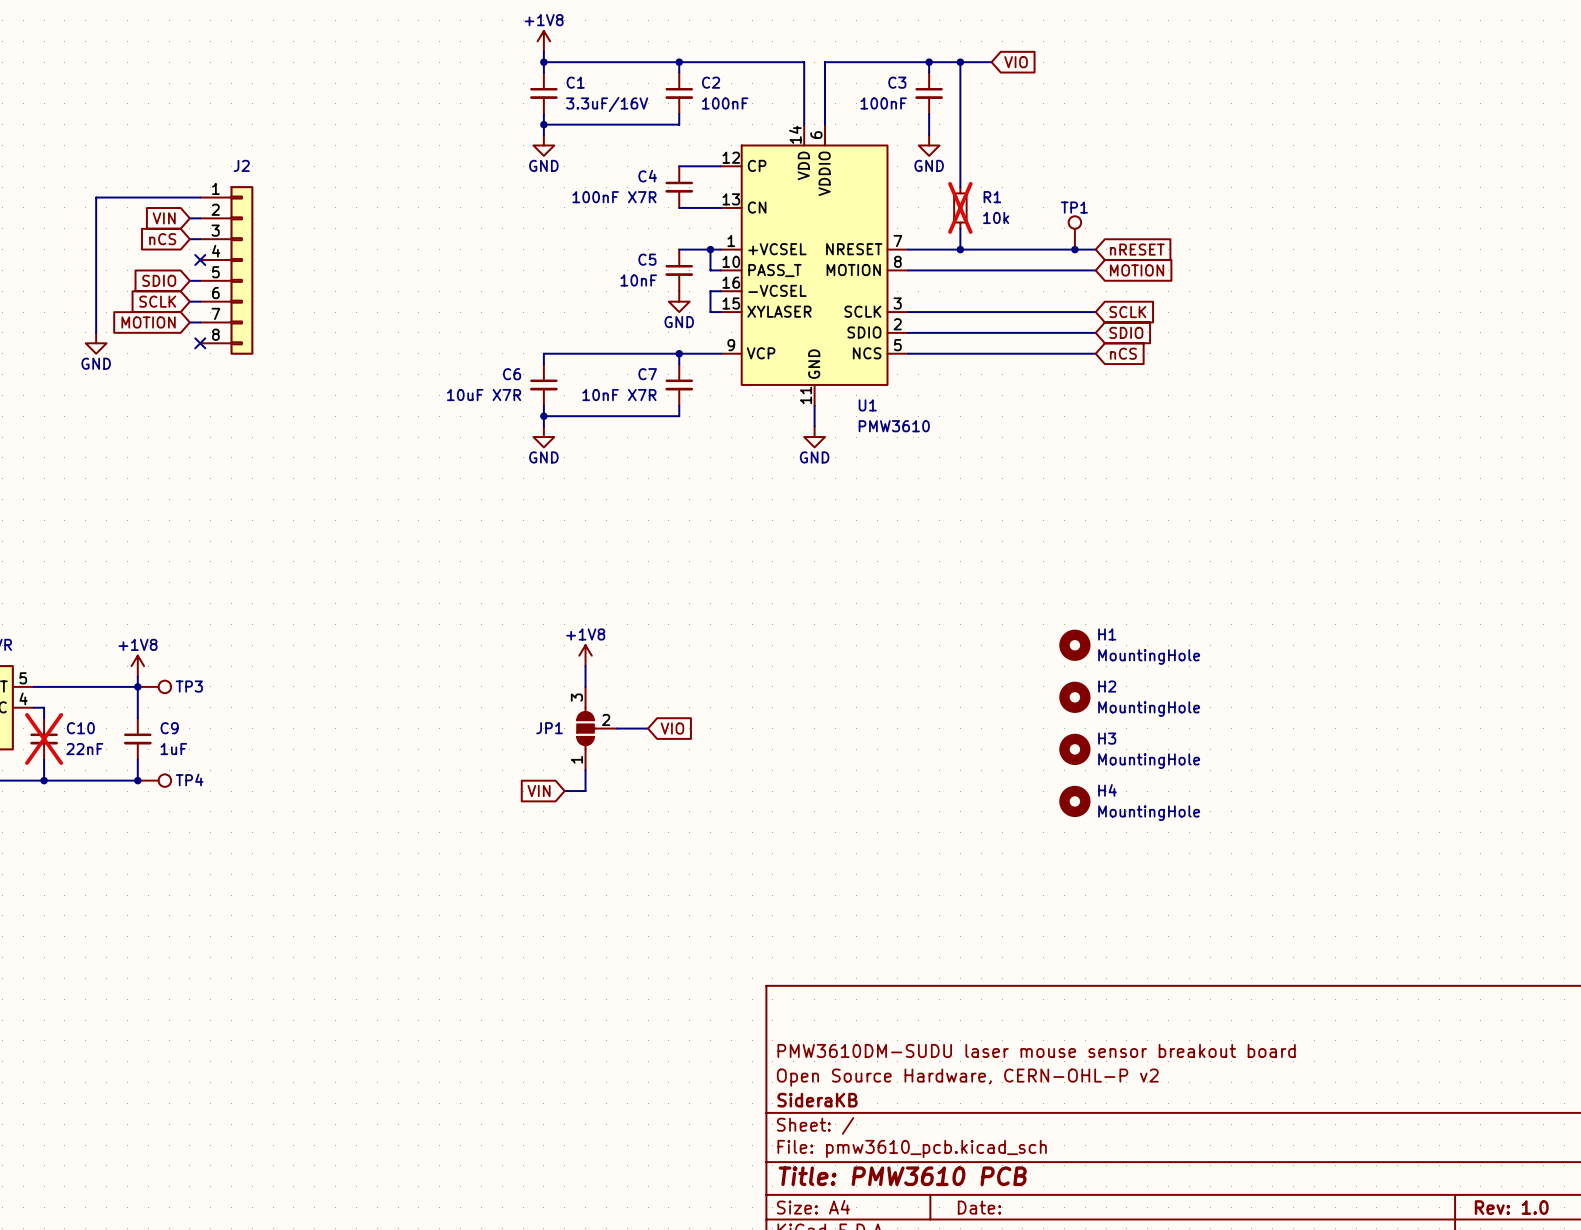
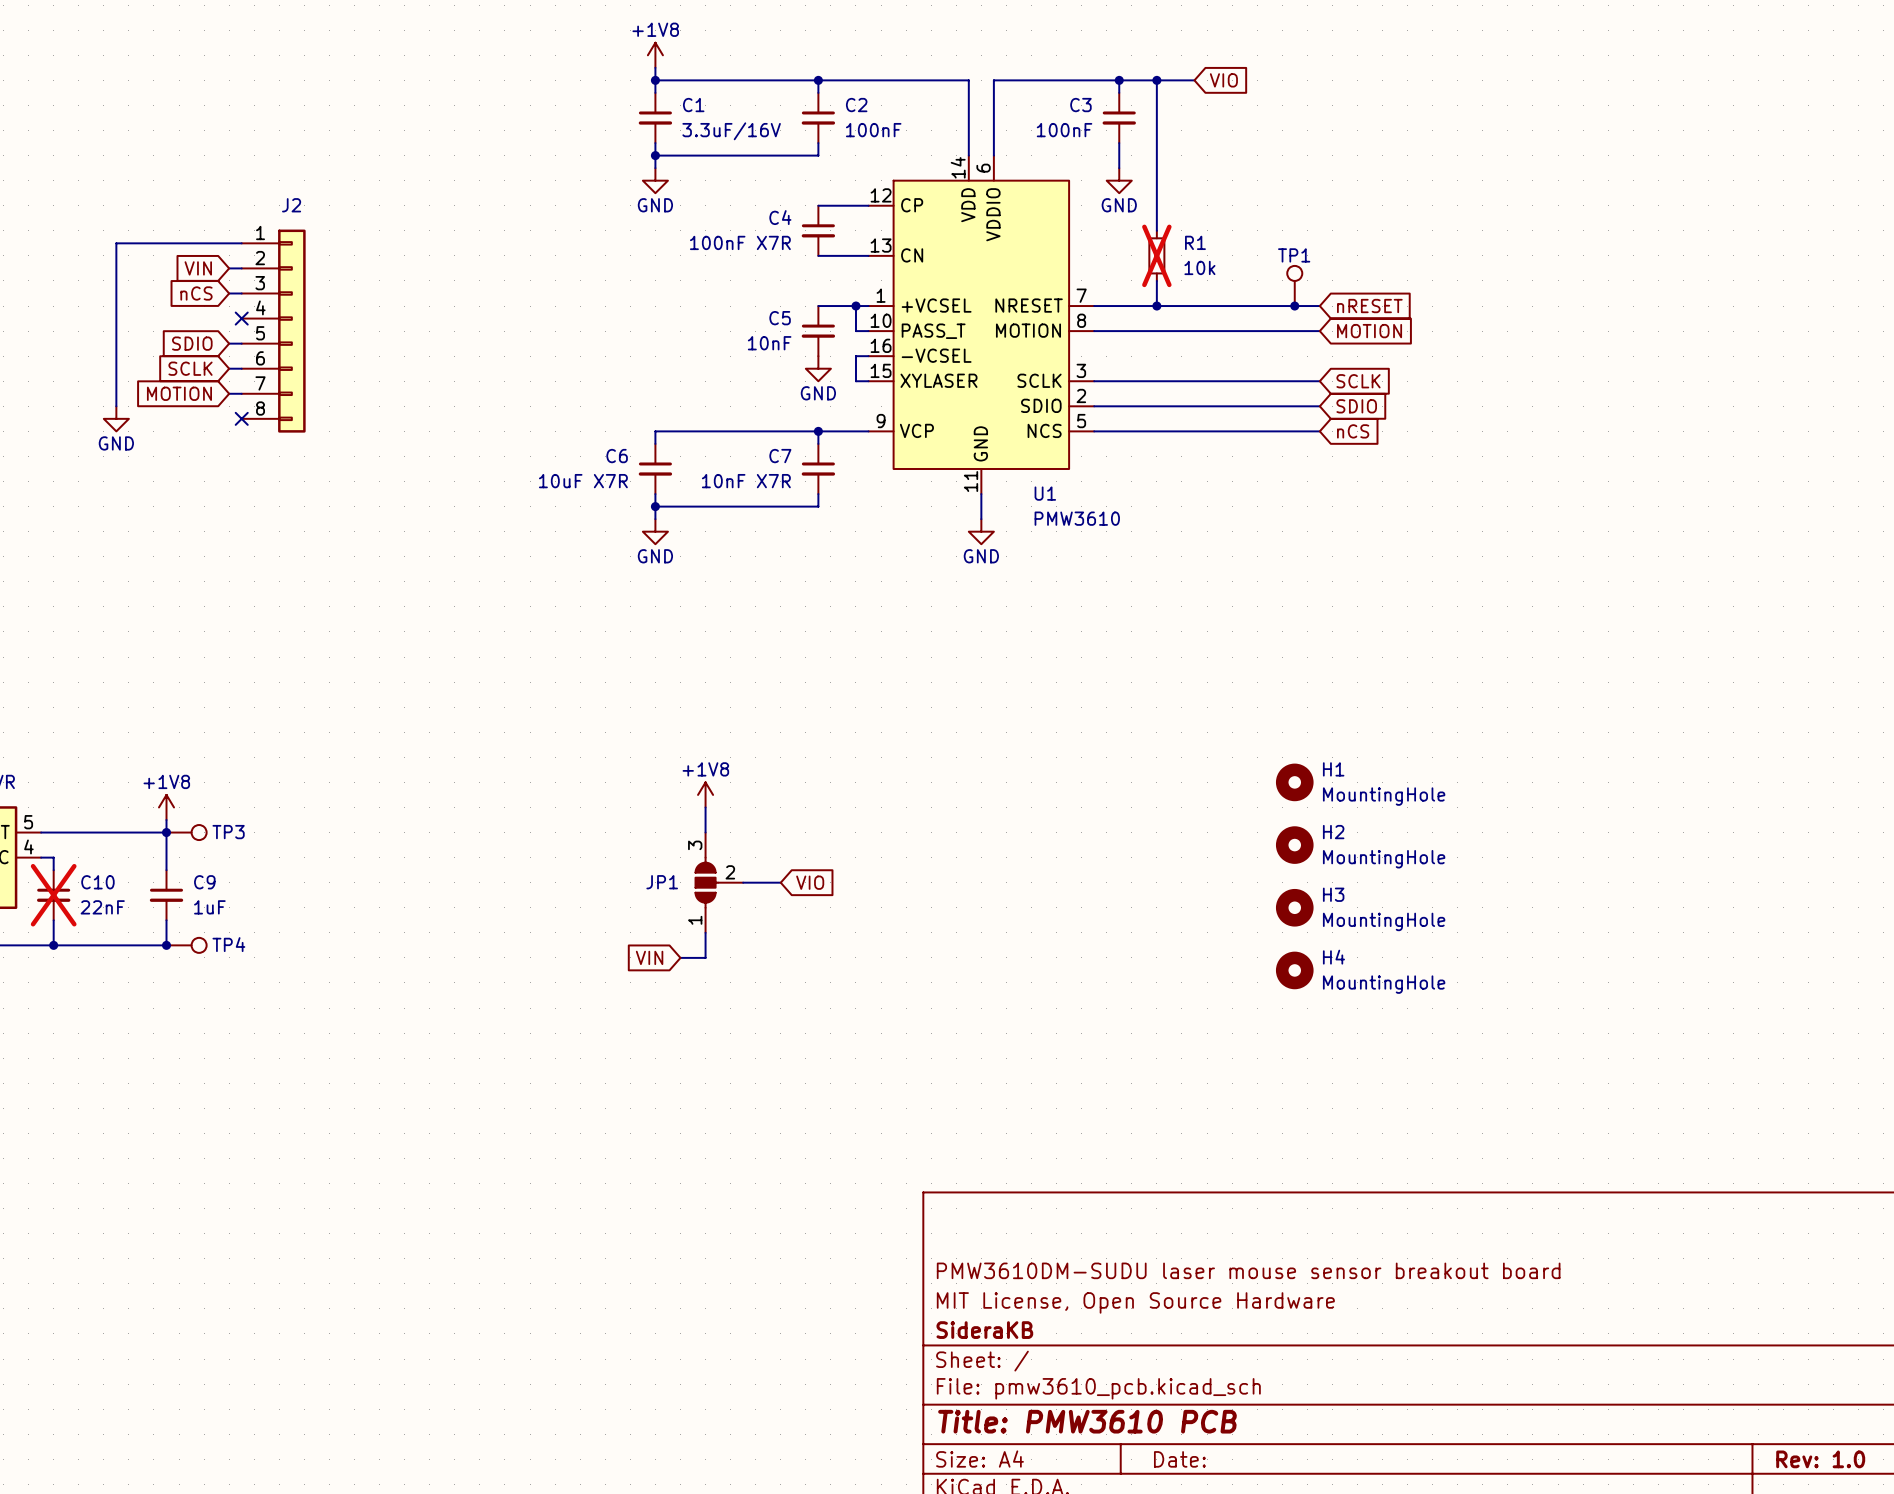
title block: Open Source Hardware, CERN-OHL-P v2 (967, 1077) -> MIT License, Open Source Hardware (1135, 1302)

